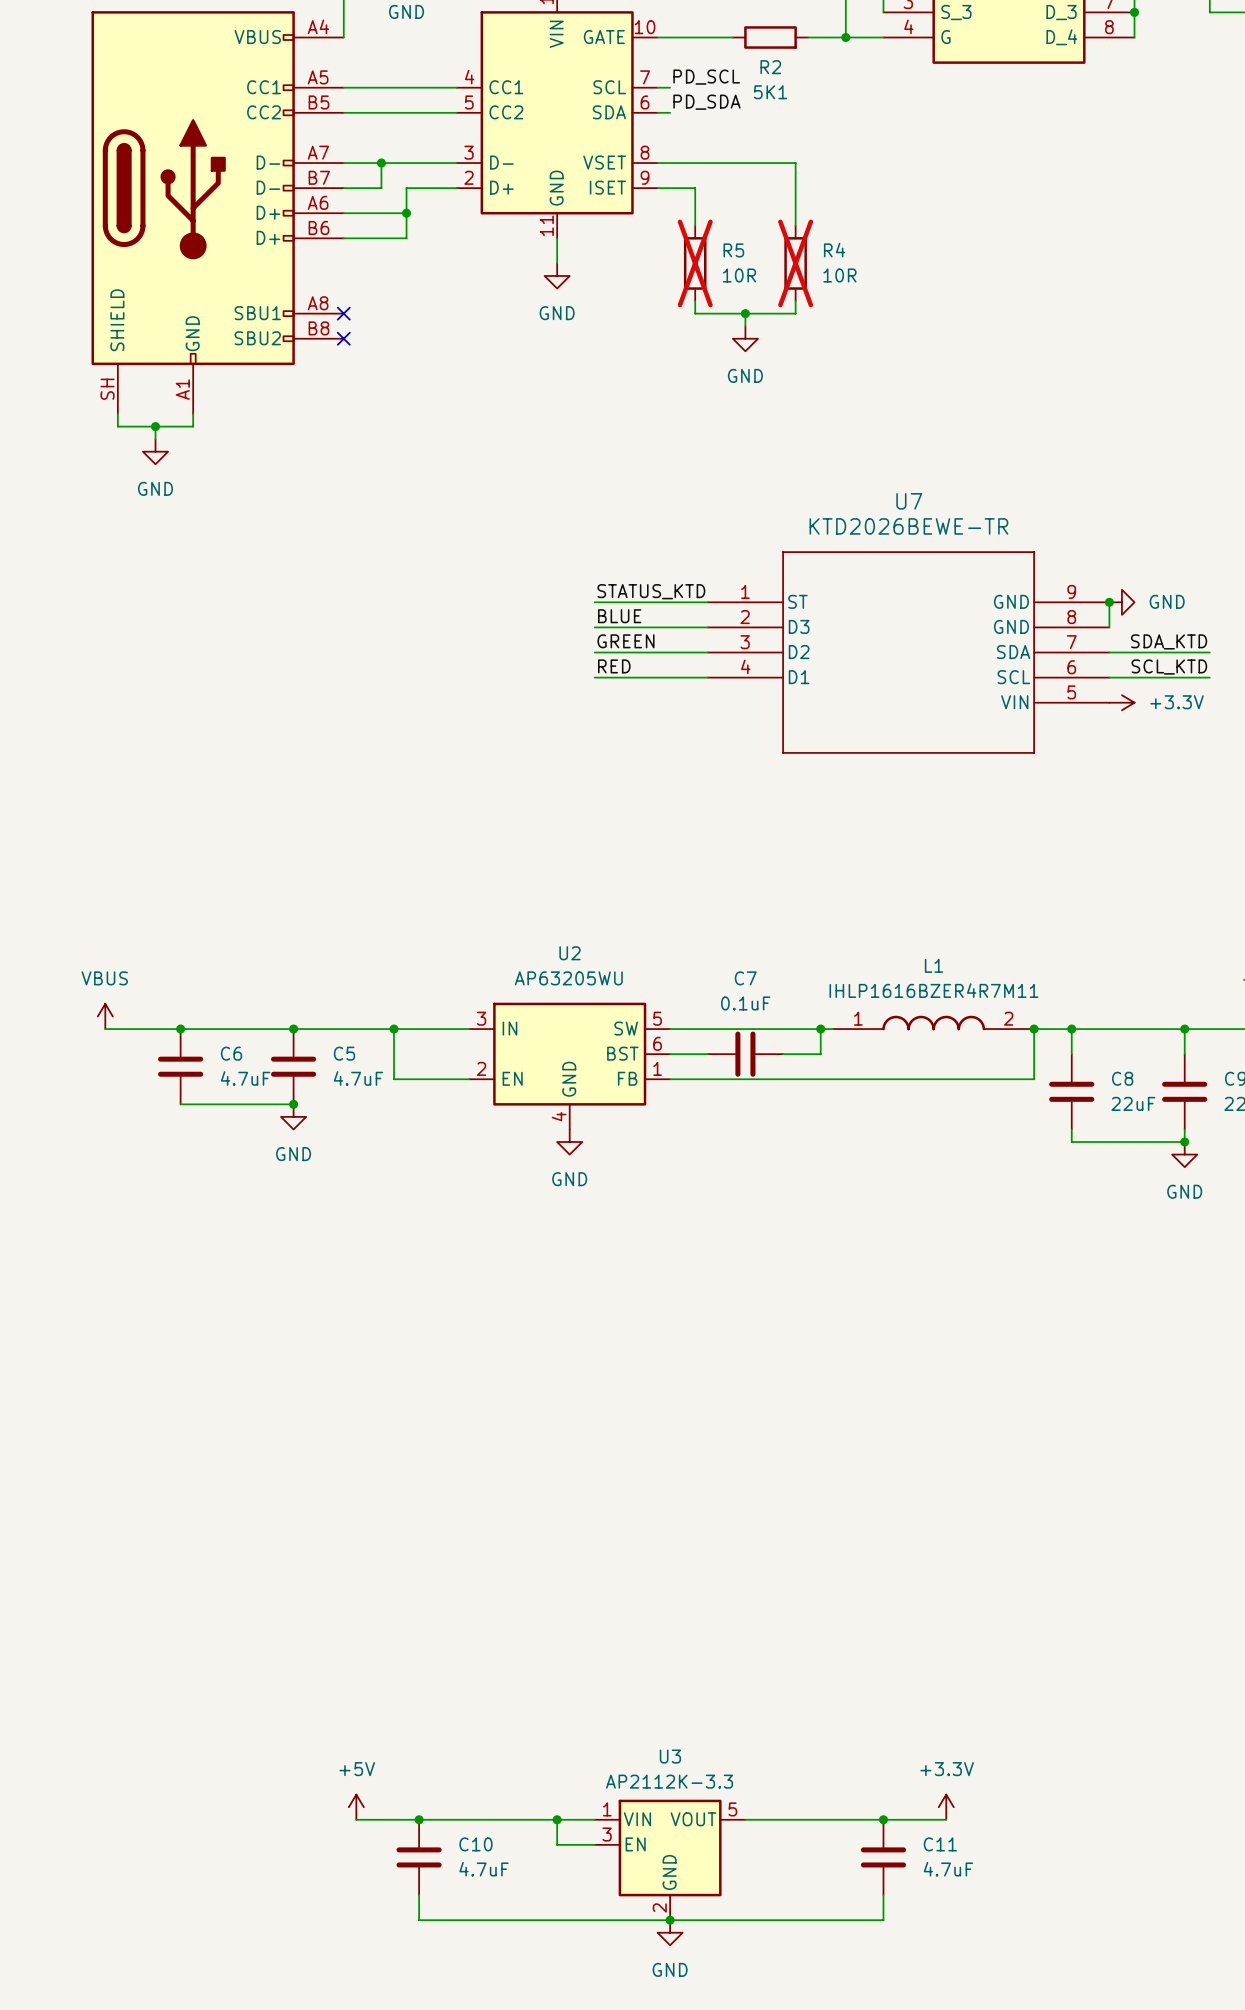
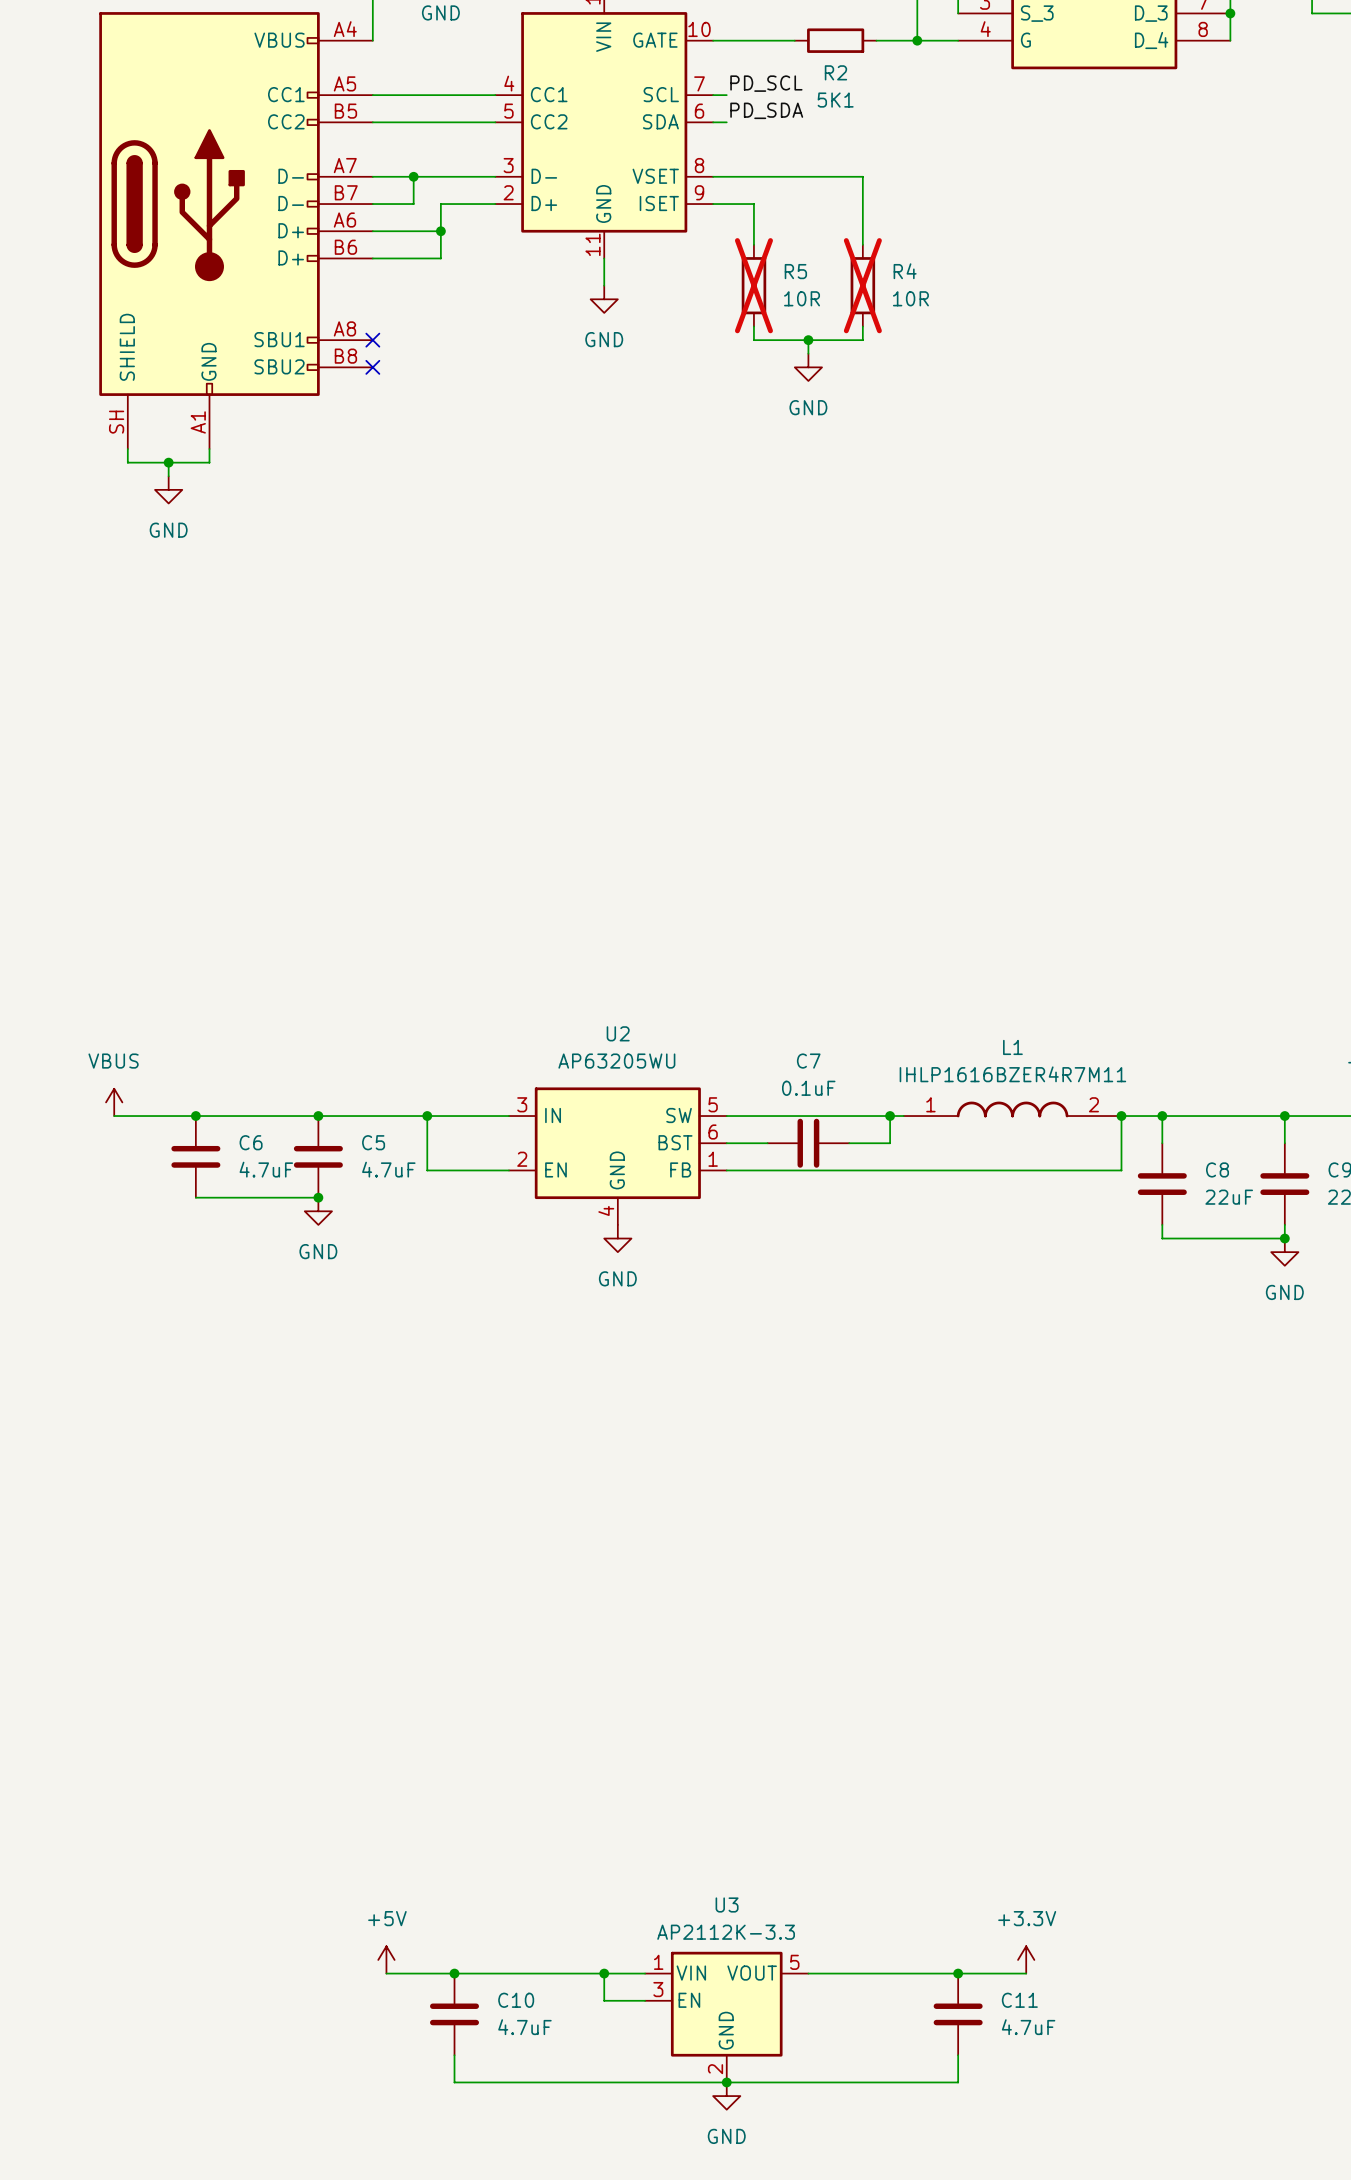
label: STATUS_KTD (651, 591) -> none
wire: (594, 602) (707, 602) -> none
wire: (1109, 602) (1109, 627) -> none
junction: (1109, 602) -> none
power symbol: GND (1121, 602) -> none
label: BLUE (619, 616) -> none
wire: (594, 627) (707, 627) -> none
label: GREEN (625, 641) -> none
label: SDA_KTD (1169, 641) -> none
wire: (594, 652) (707, 652) -> none
U7: KTD2026BEWE-TR (908, 652) -> none
wire: (1109, 652) (1209, 652) -> none
label: RED (614, 666) -> none
label: SCL_KTD (1169, 667) -> none
wire: (594, 677) (707, 677) -> none
wire: (1109, 677) (1209, 677) -> none
power symbol: +3.3V (1121, 702) -> none

